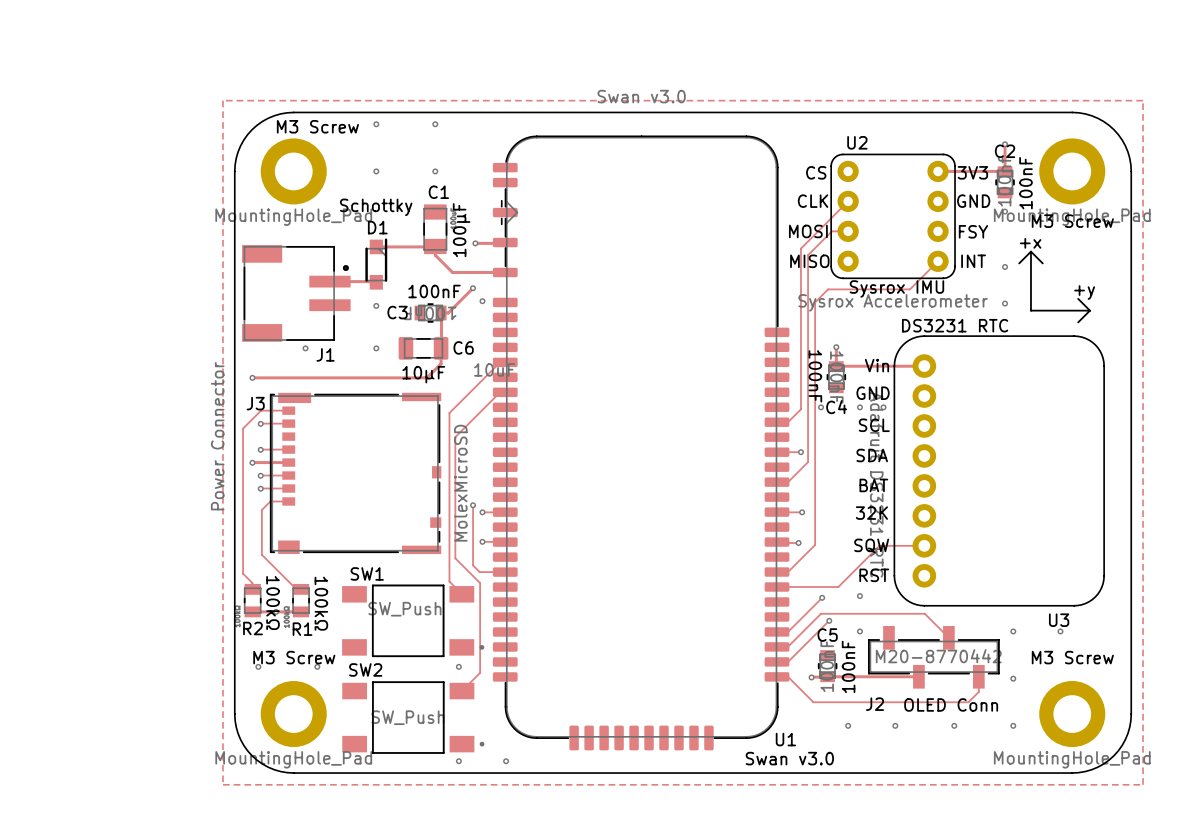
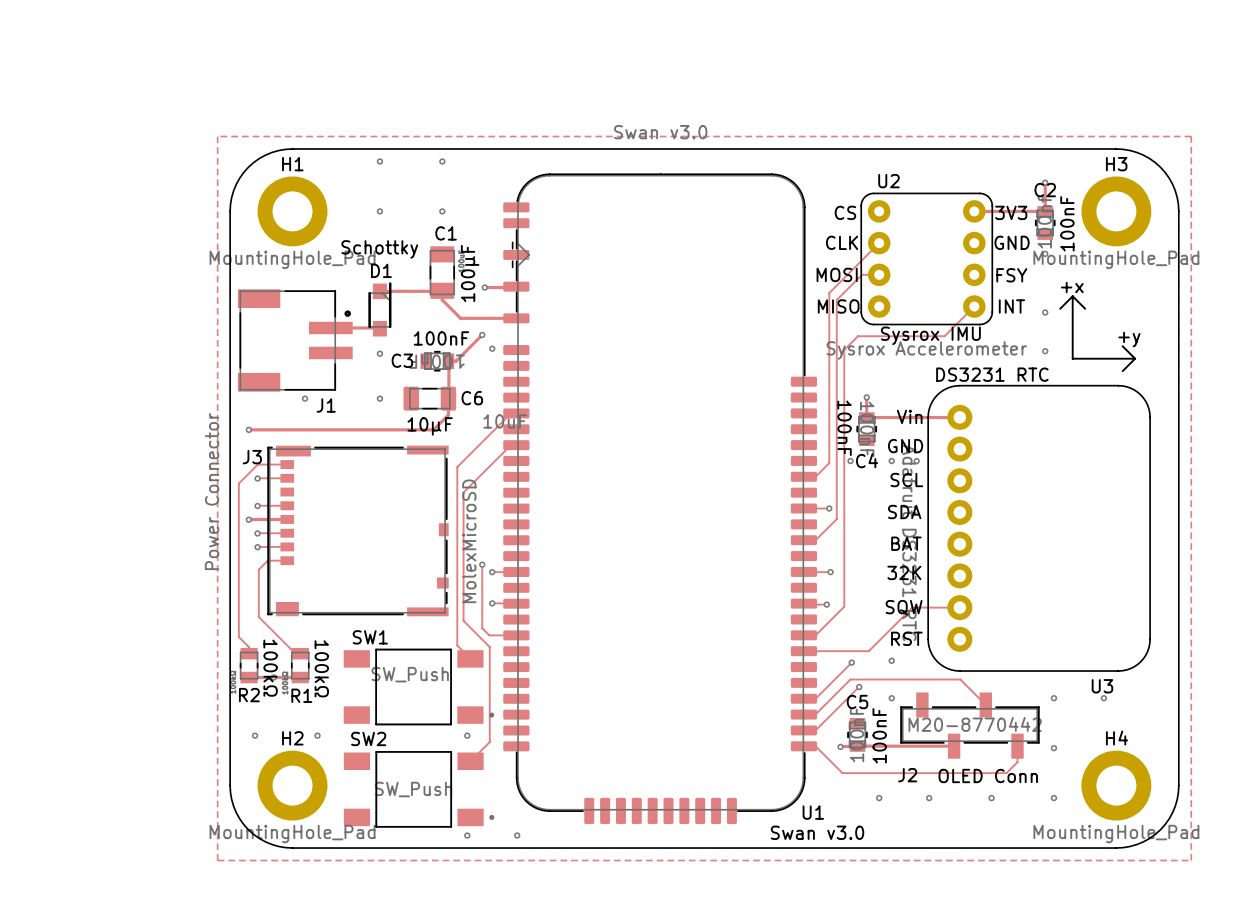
M3 Screw name: M3 Screw (317, 126) -> H1 (292, 164)
M3 Screw name: M3 Screw (1072, 221) -> H3 (1116, 164)
M3 Screw name: M3 Screw (294, 657) -> H2 (292, 738)
M3 Screw name: M3 Screw (1072, 657) -> H4 (1116, 738)

